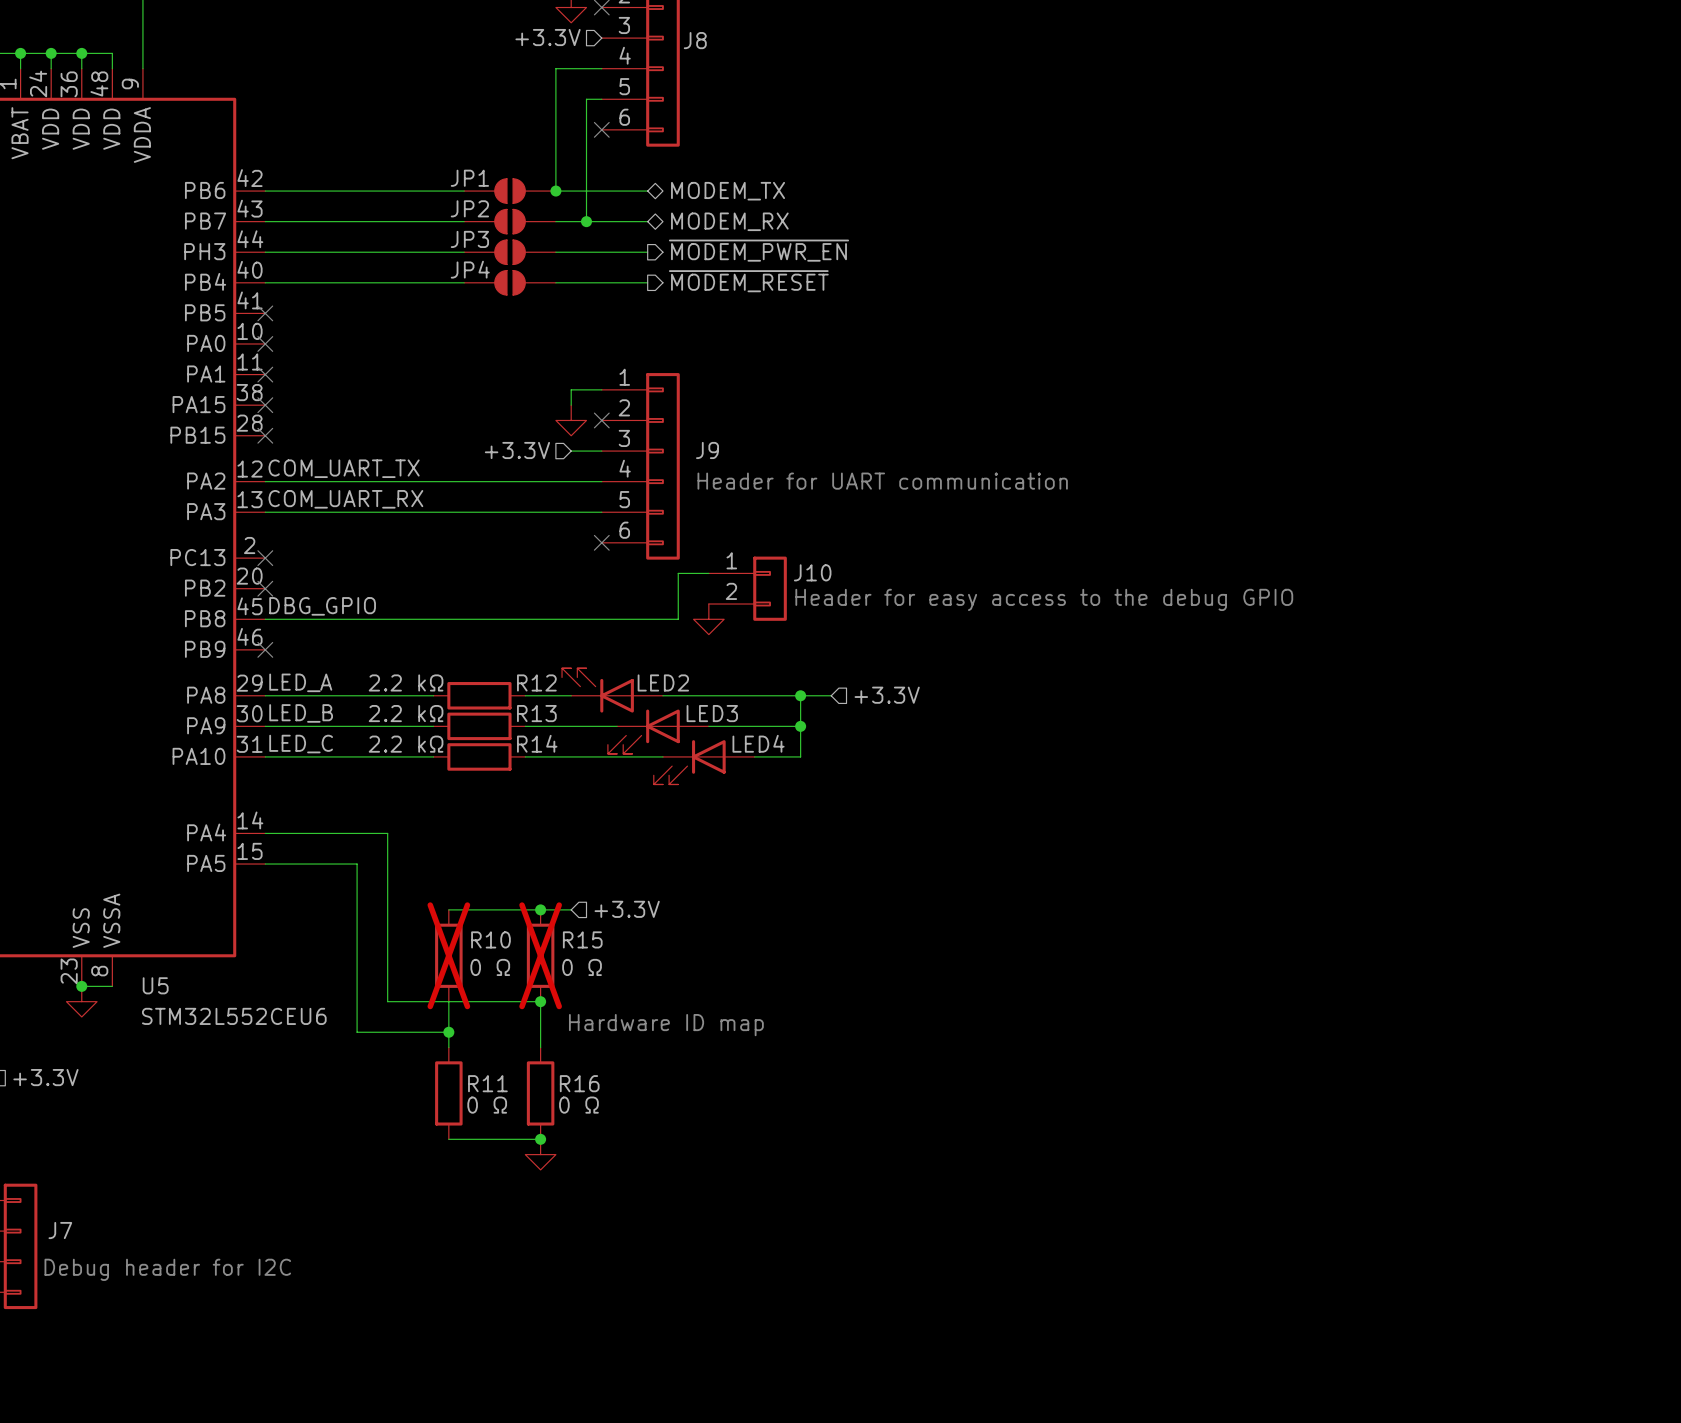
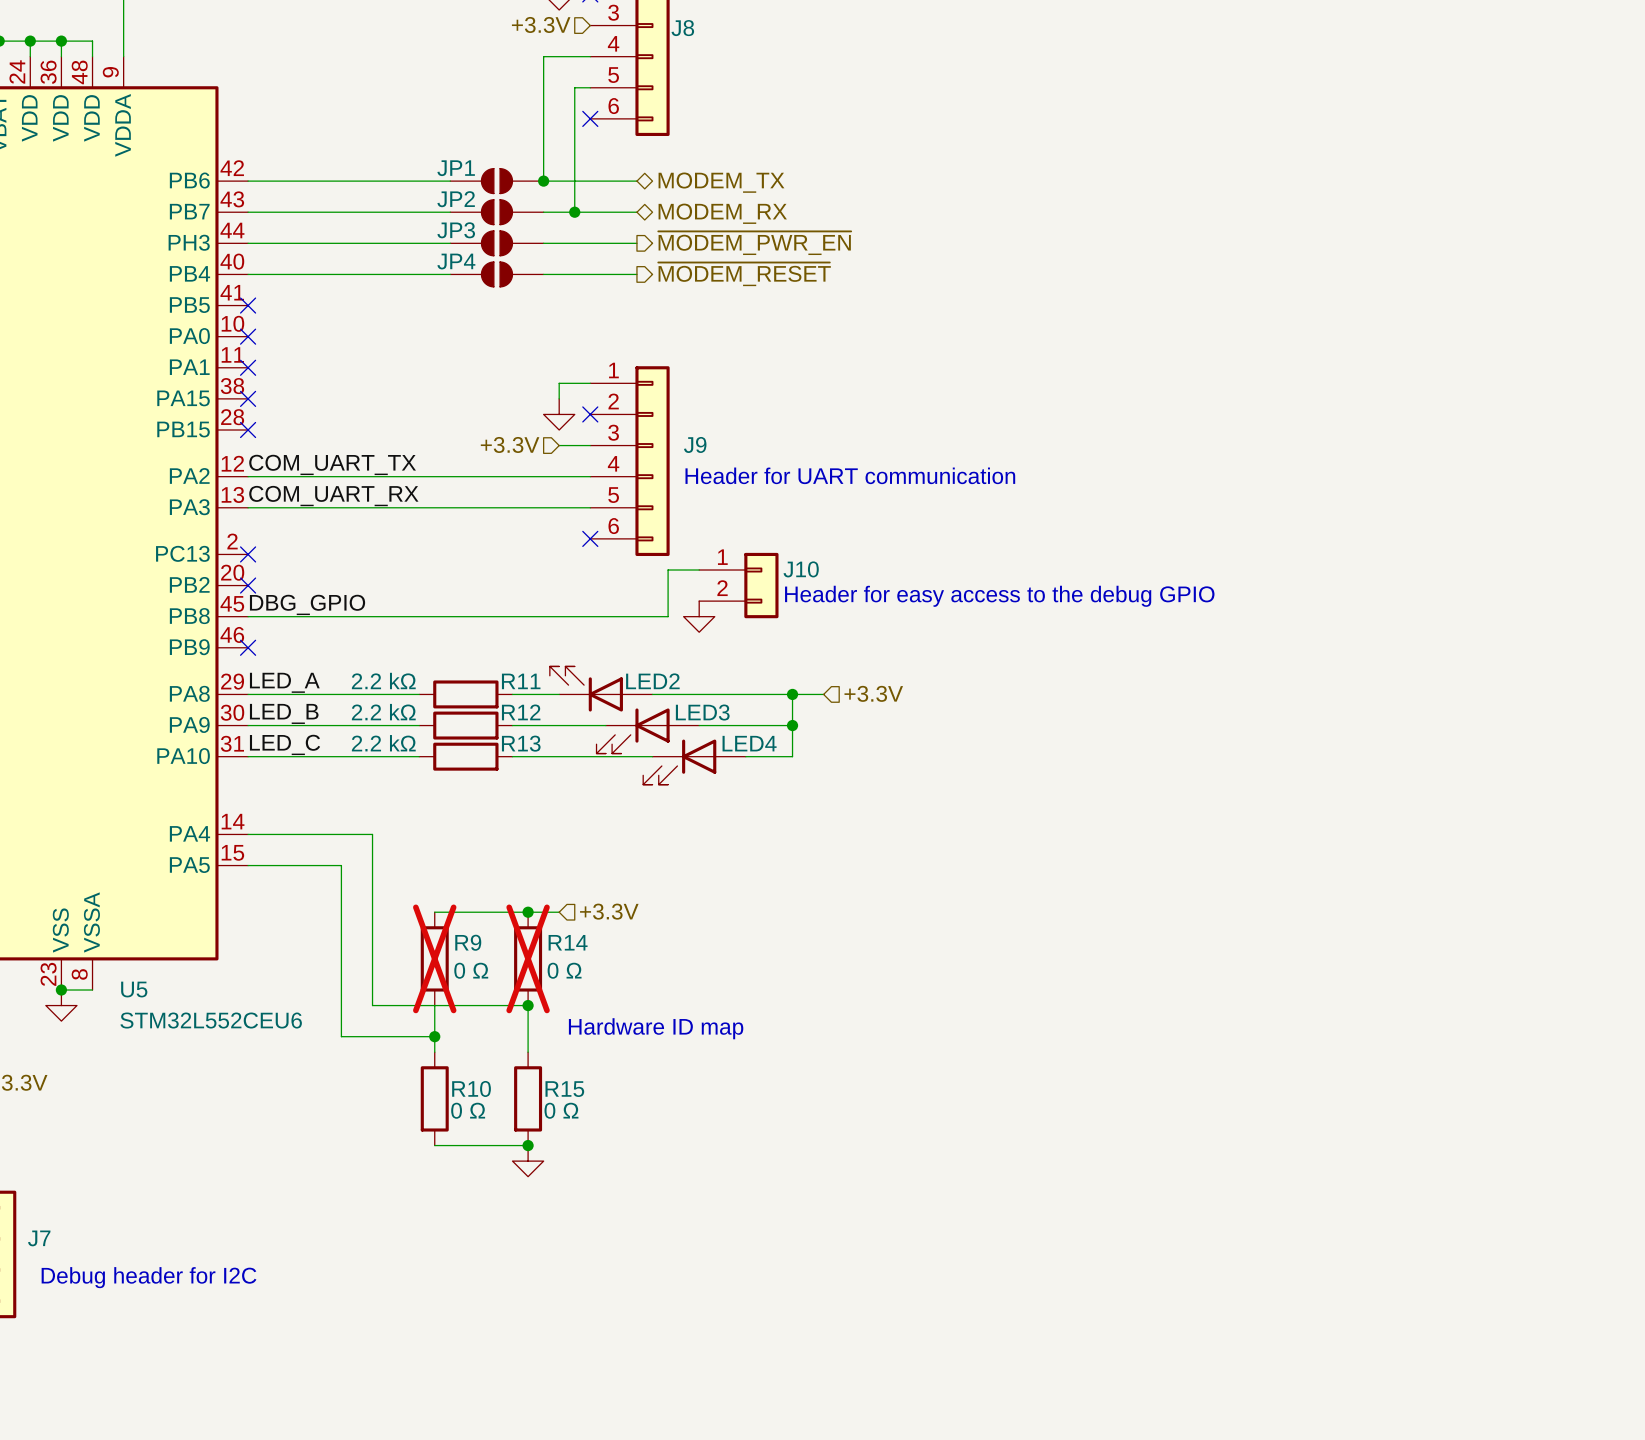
R12 name: R12 (536, 682) -> R11 (521, 681)
R13 name: R13 (536, 713) -> R12 (521, 712)
R14 name: R14 (537, 743) -> R13 (521, 743)
R10 name: R10 (490, 939) -> R9 (468, 942)
R15 name: R15 (582, 939) -> R14 (568, 942)
R11 name: R11 (487, 1083) -> R10 (471, 1088)
R16 name: R16 (579, 1083) -> R15 (564, 1089)

